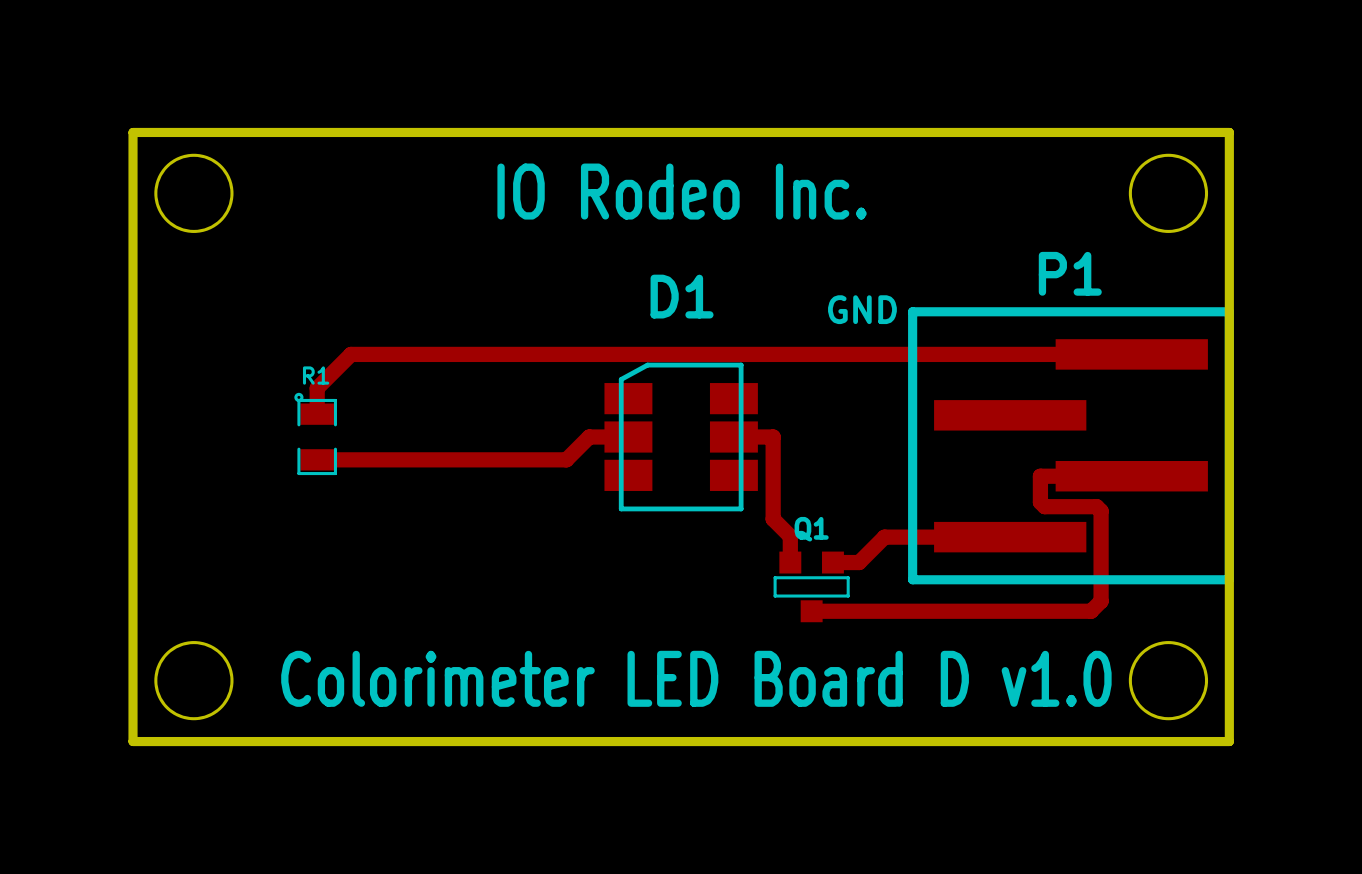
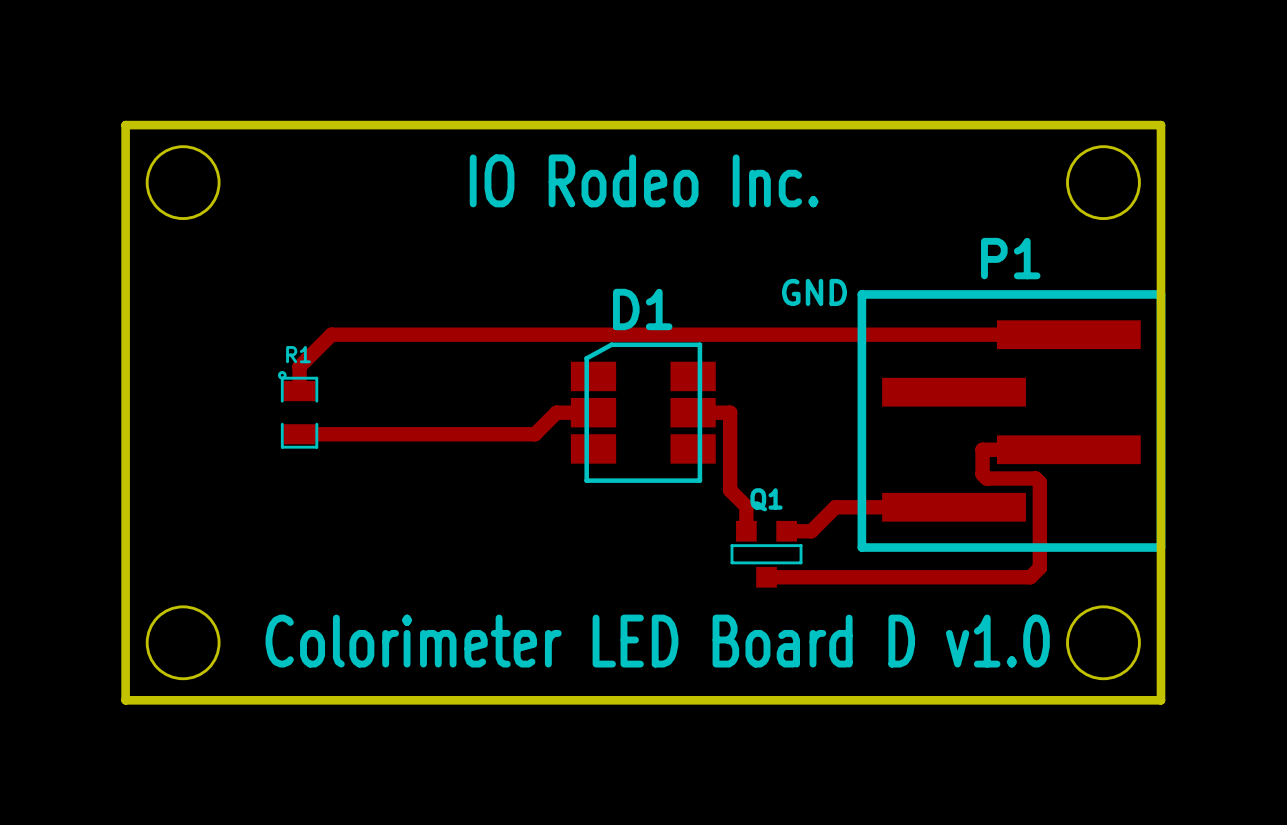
D1 name position: D1 (682, 296) -> D1 (642, 309)

